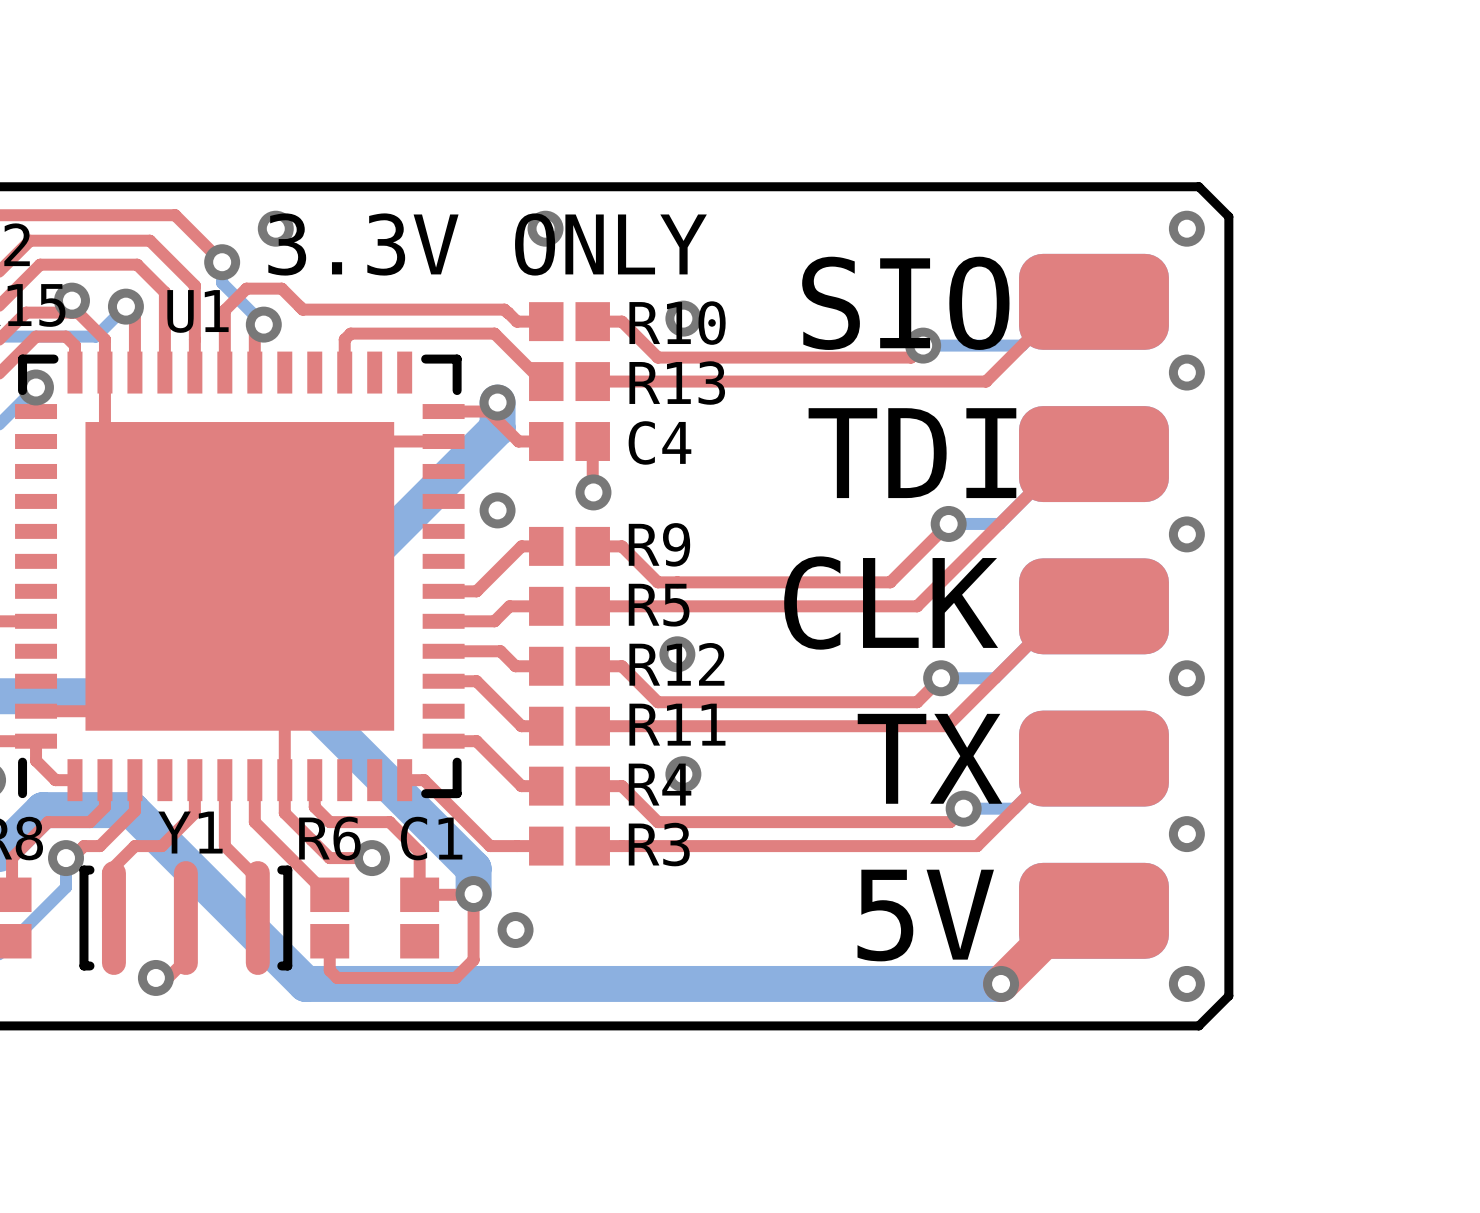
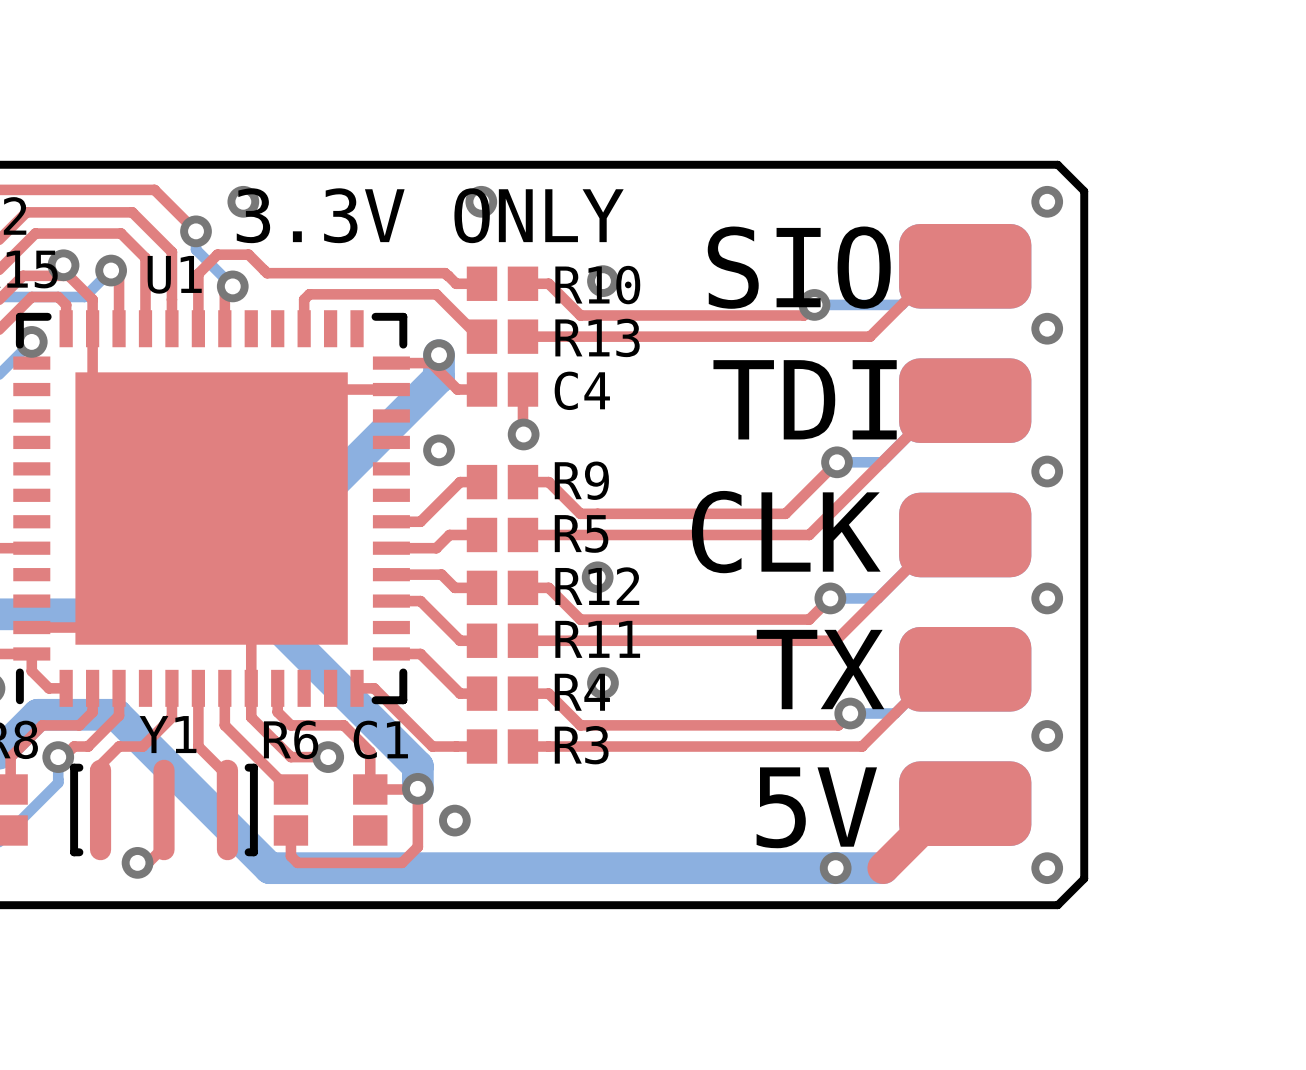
via position: (1001, 983) -> (835, 868)

